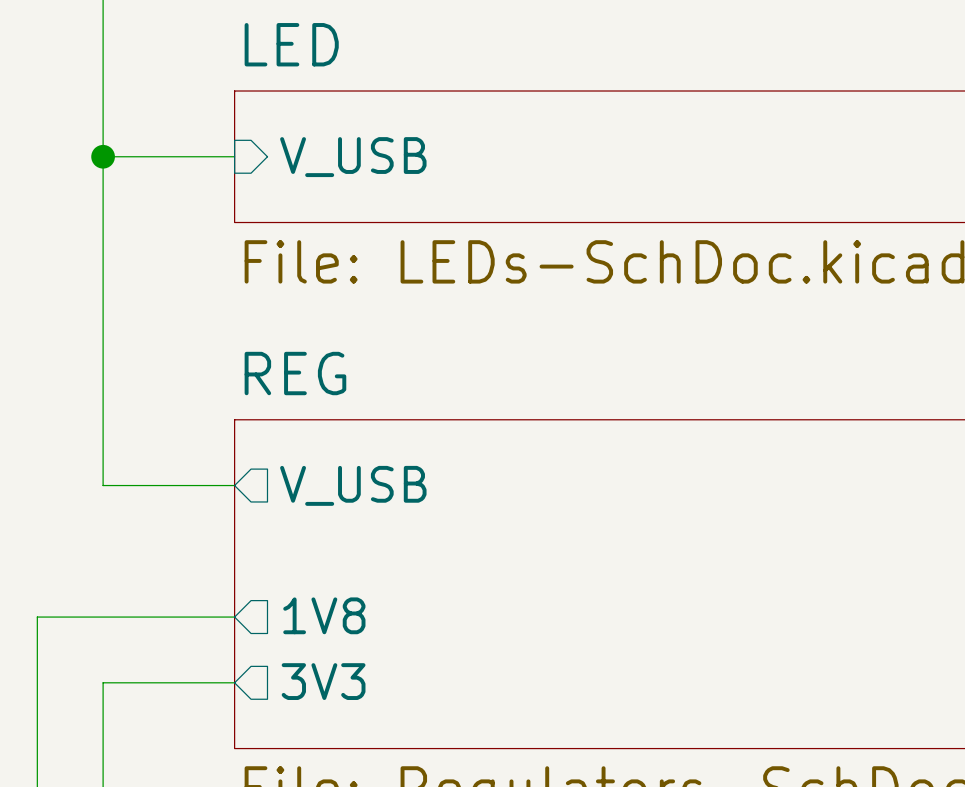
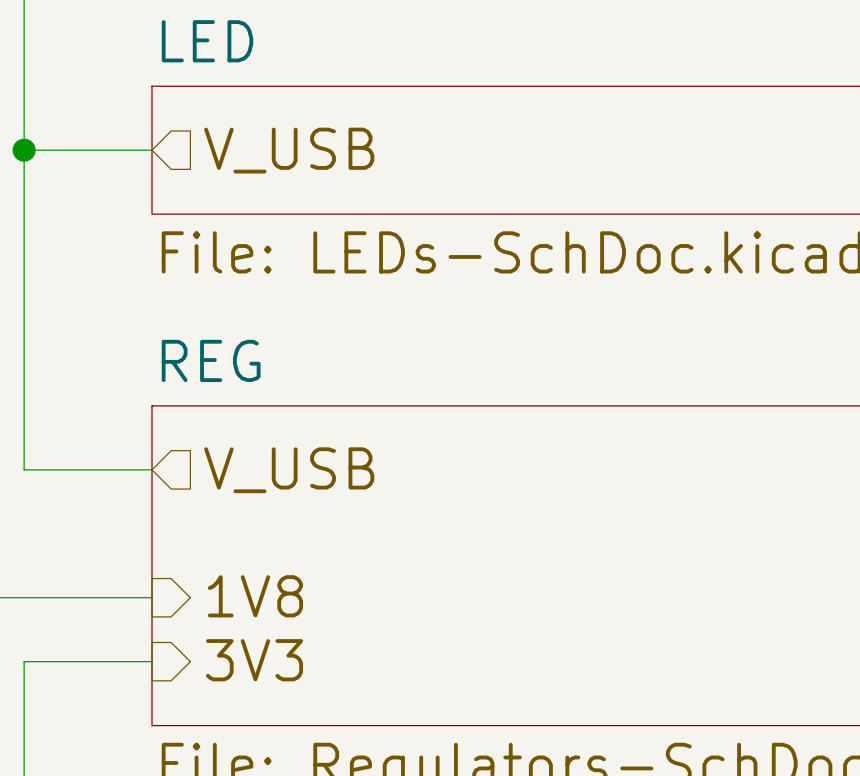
sheet pin: V_USB (353, 157) -> none
hierarchical label: none -> V_USB (289, 150)
sheet pin: V_USB (353, 485) -> none
hierarchical label: none -> V_USB (289, 470)
sheet pin: 1V8 (324, 615) -> none
hierarchical label: none -> 1V8 (255, 596)
sheet pin: 3V3 (323, 681) -> none
hierarchical label: none -> 3V3 (254, 660)

